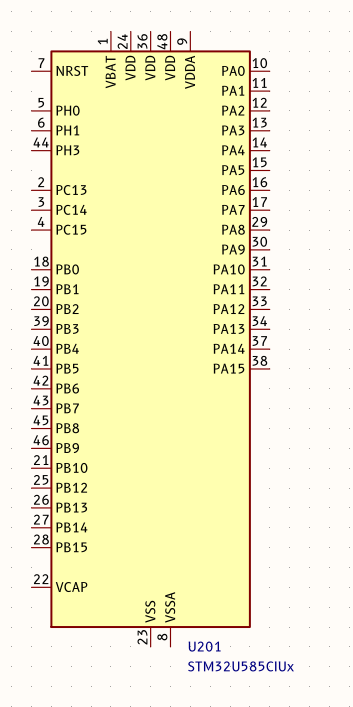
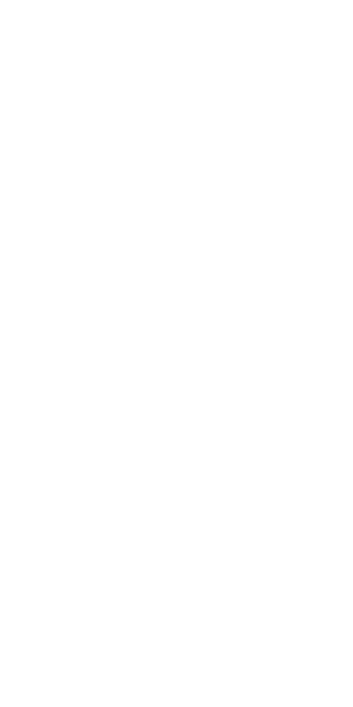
U201: STM32U585CIUx (150, 339) -> none

